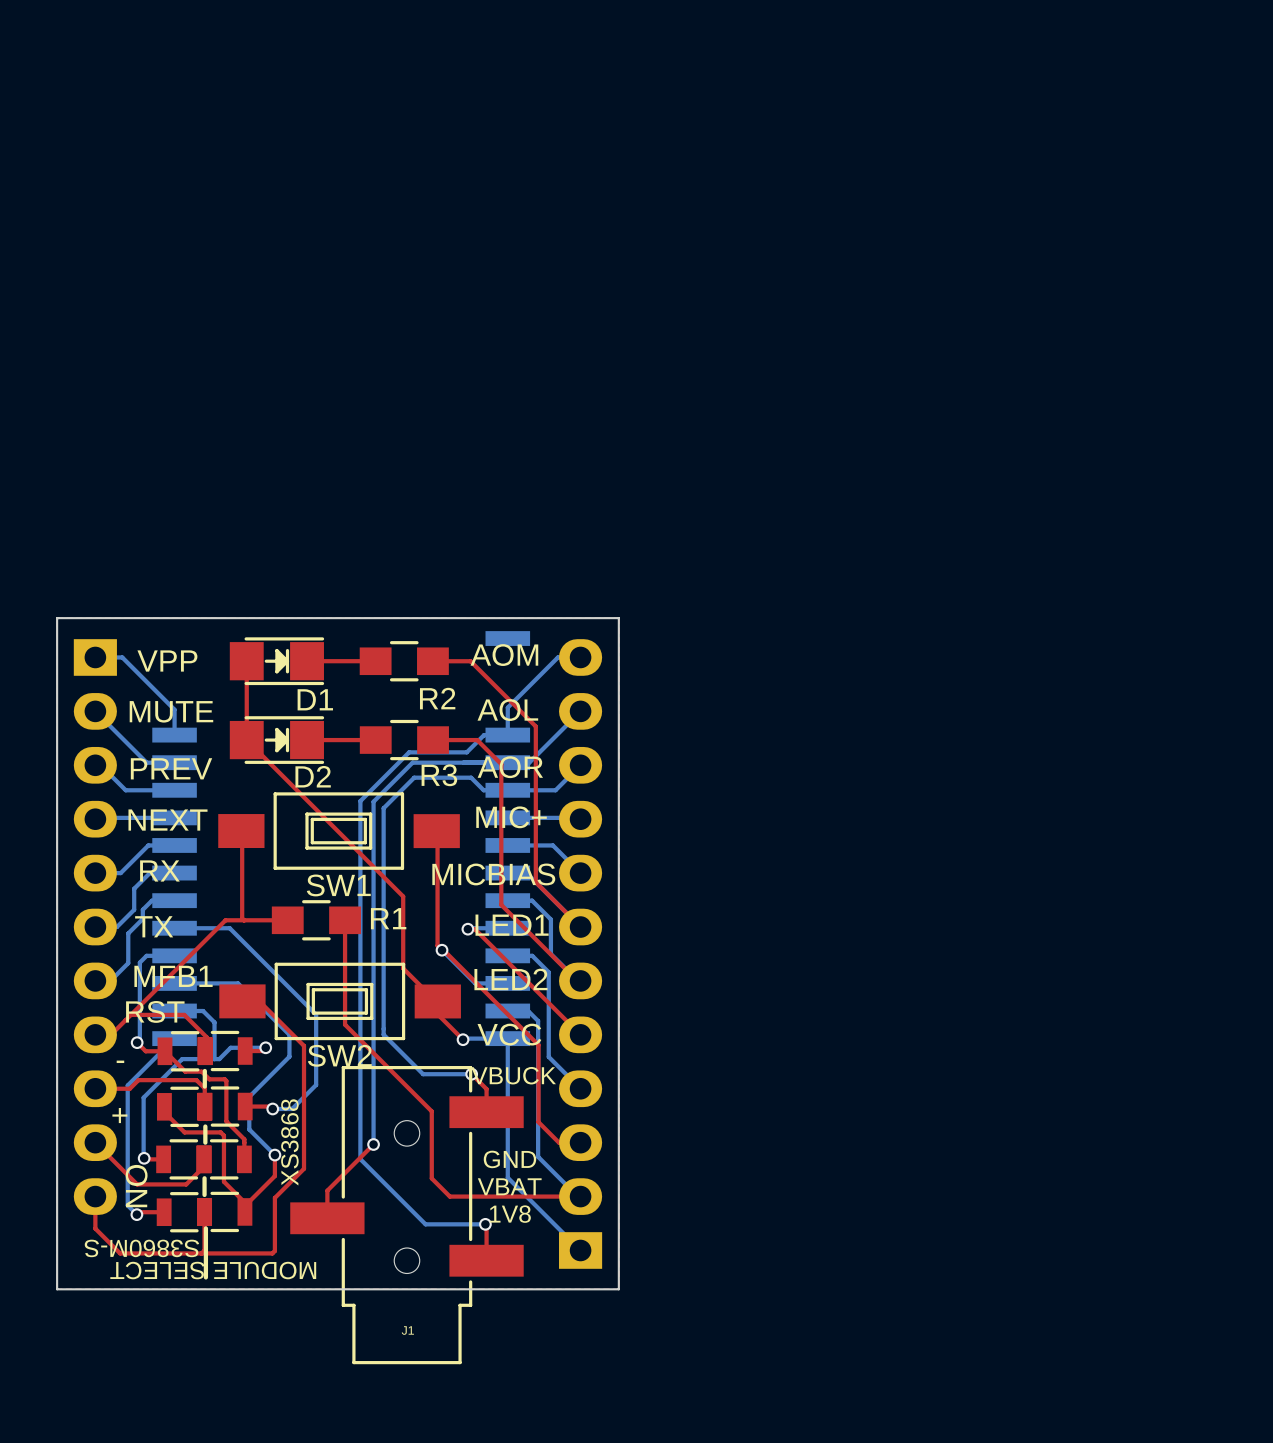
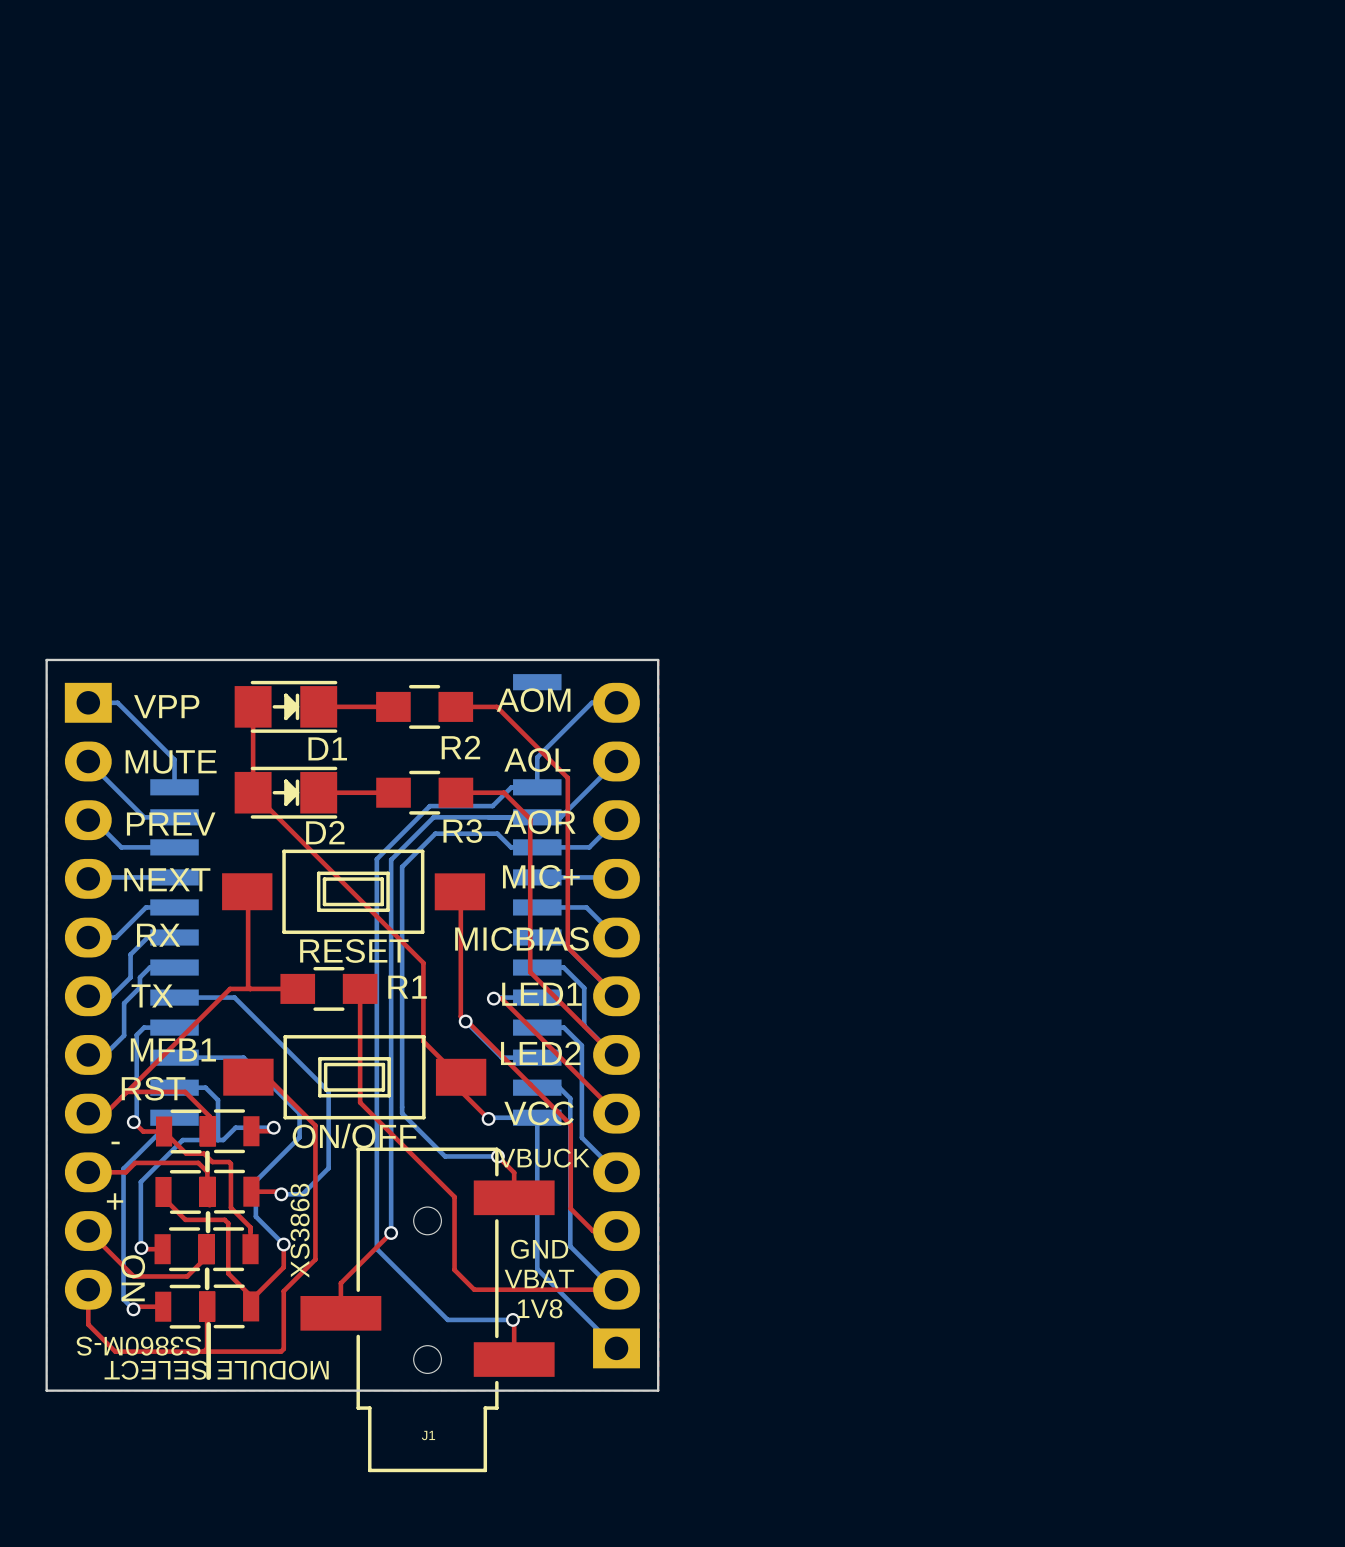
SW1 name: SW1 (338, 885) -> RESET (354, 950)
SW2 name: SW2 (339, 1055) -> ON/OFF (354, 1136)

